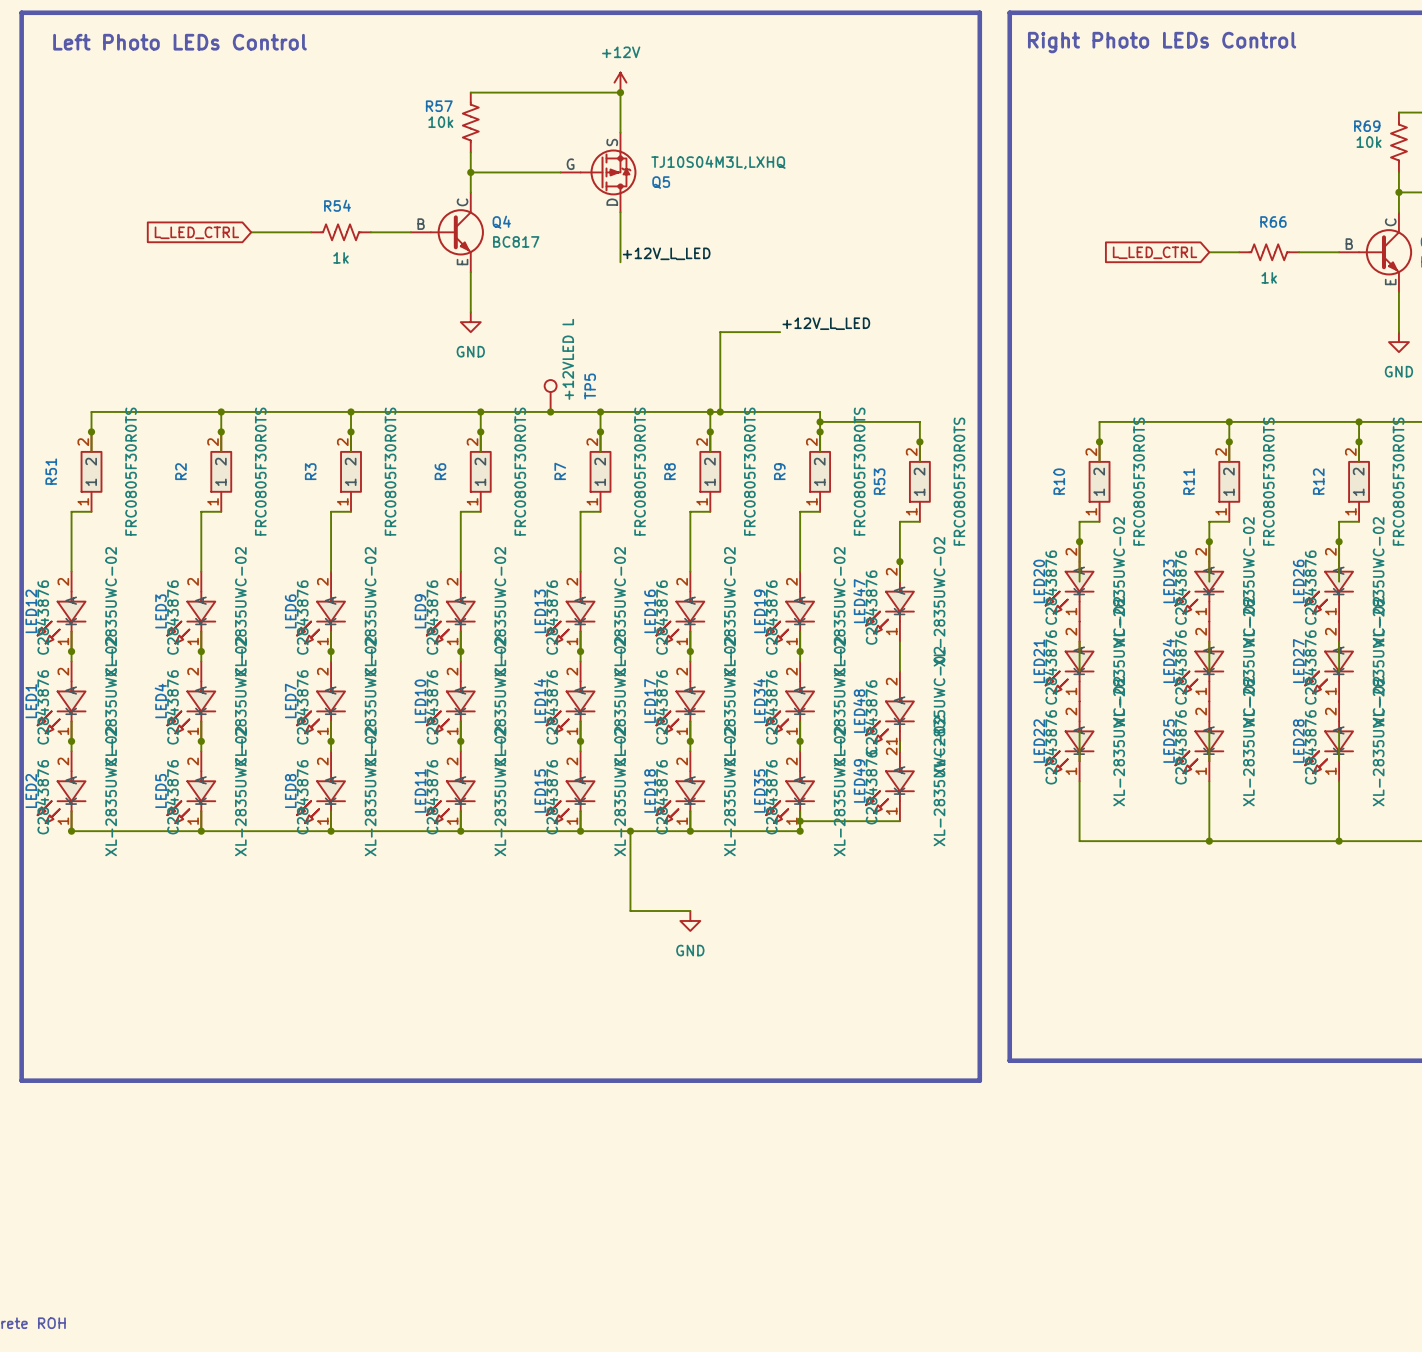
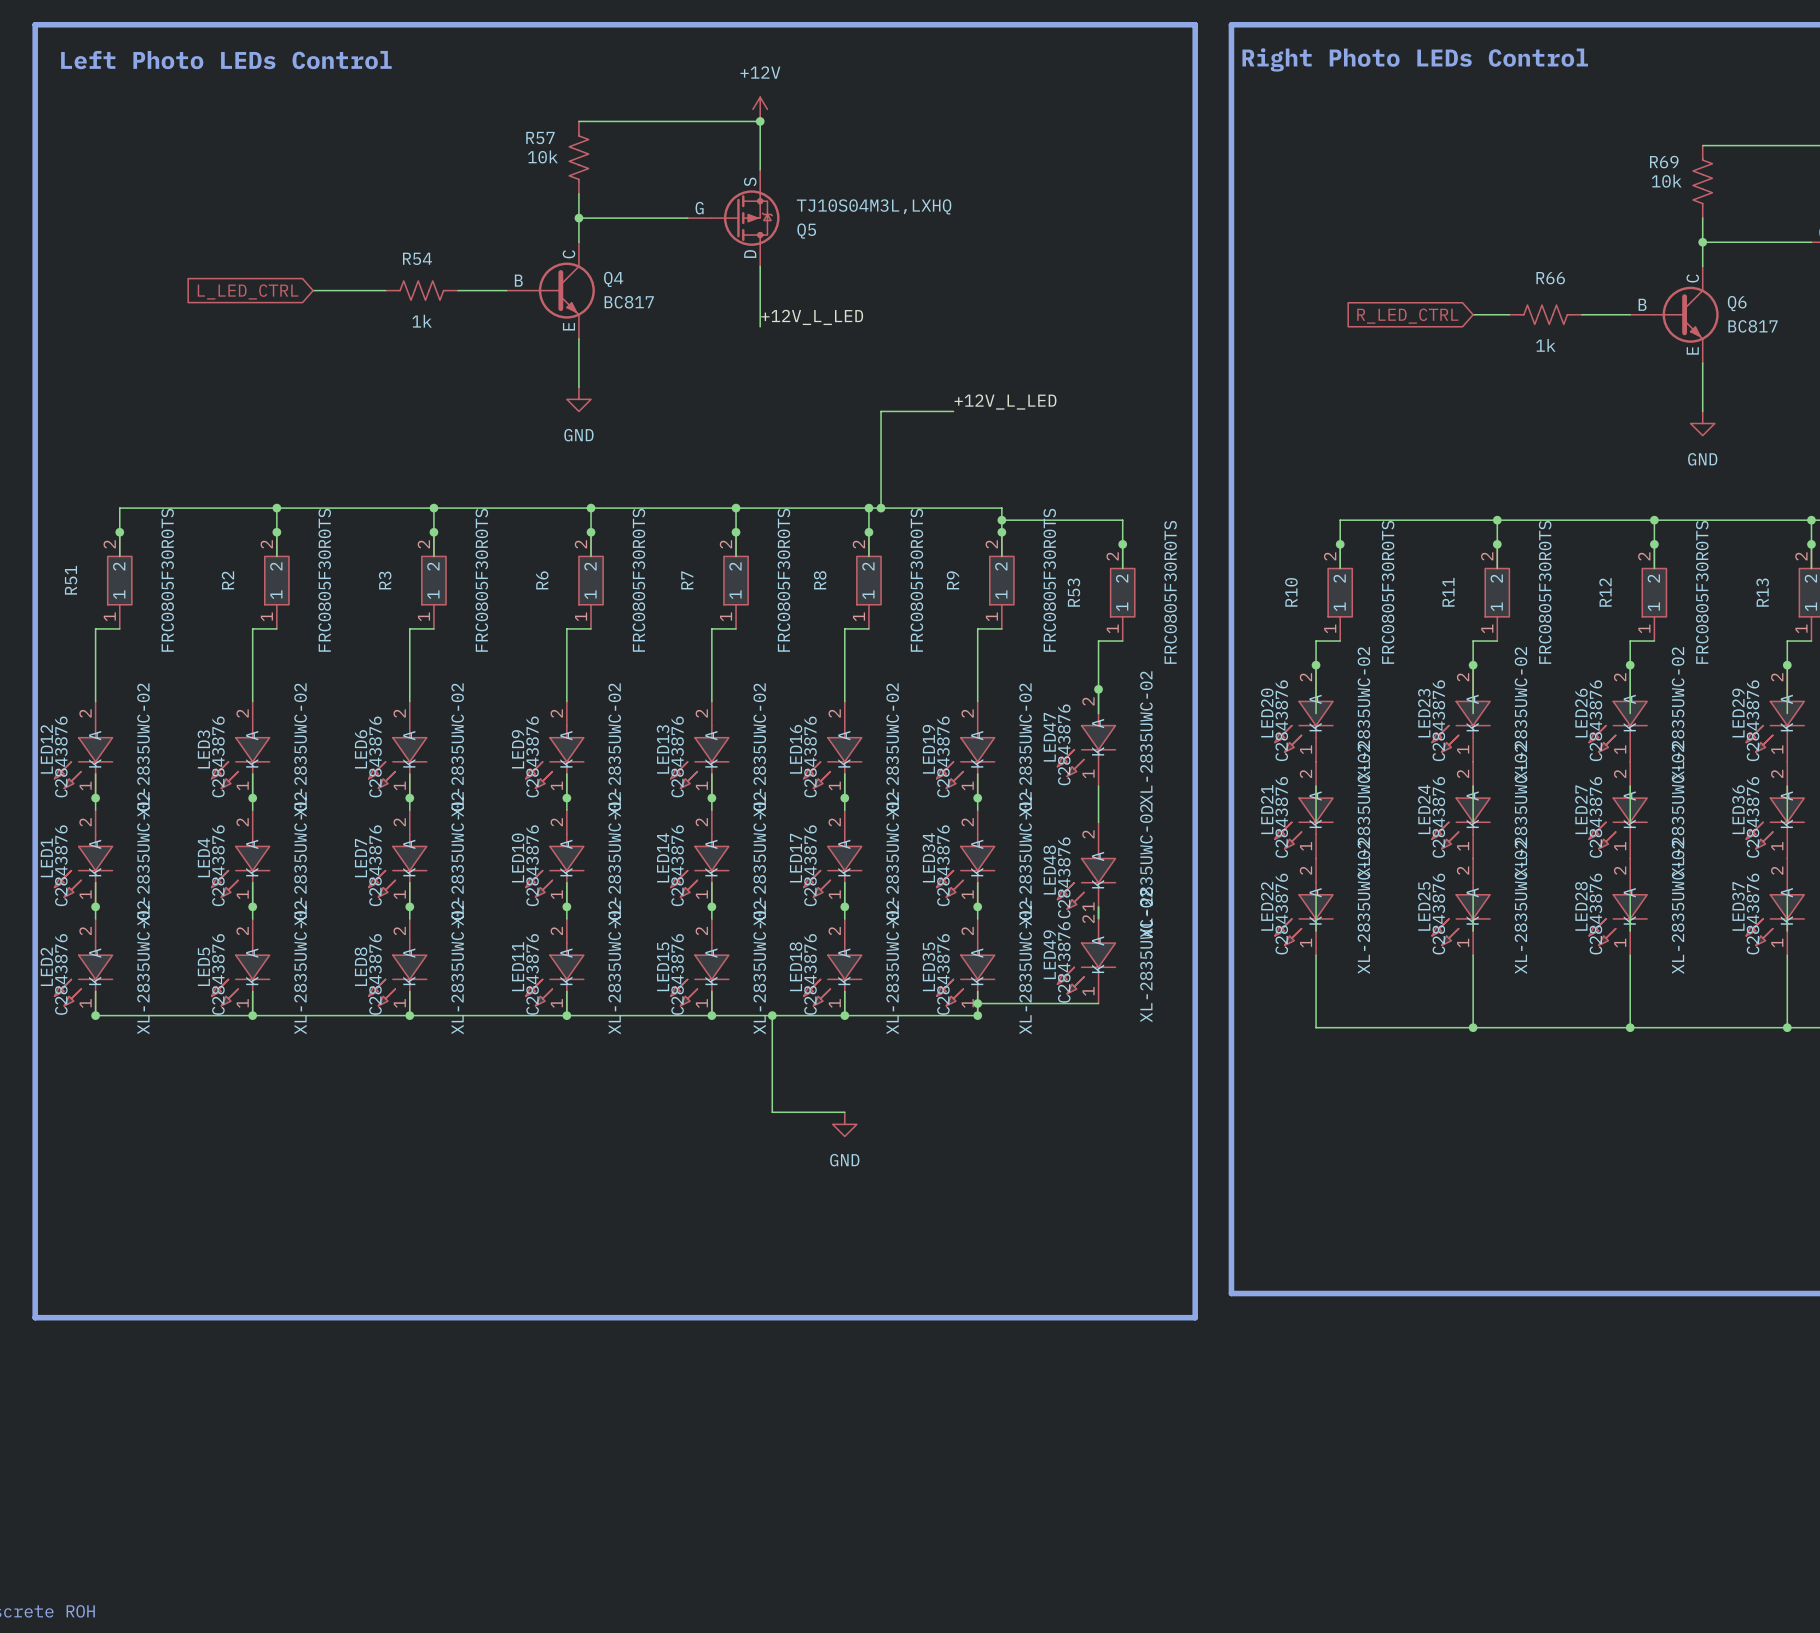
global label: L_LED_CTRL (1155, 252) -> R_LED_CTRL (1407, 316)
TP5: +12VLED L (550, 396) -> none
junction: (550, 411) -> none

